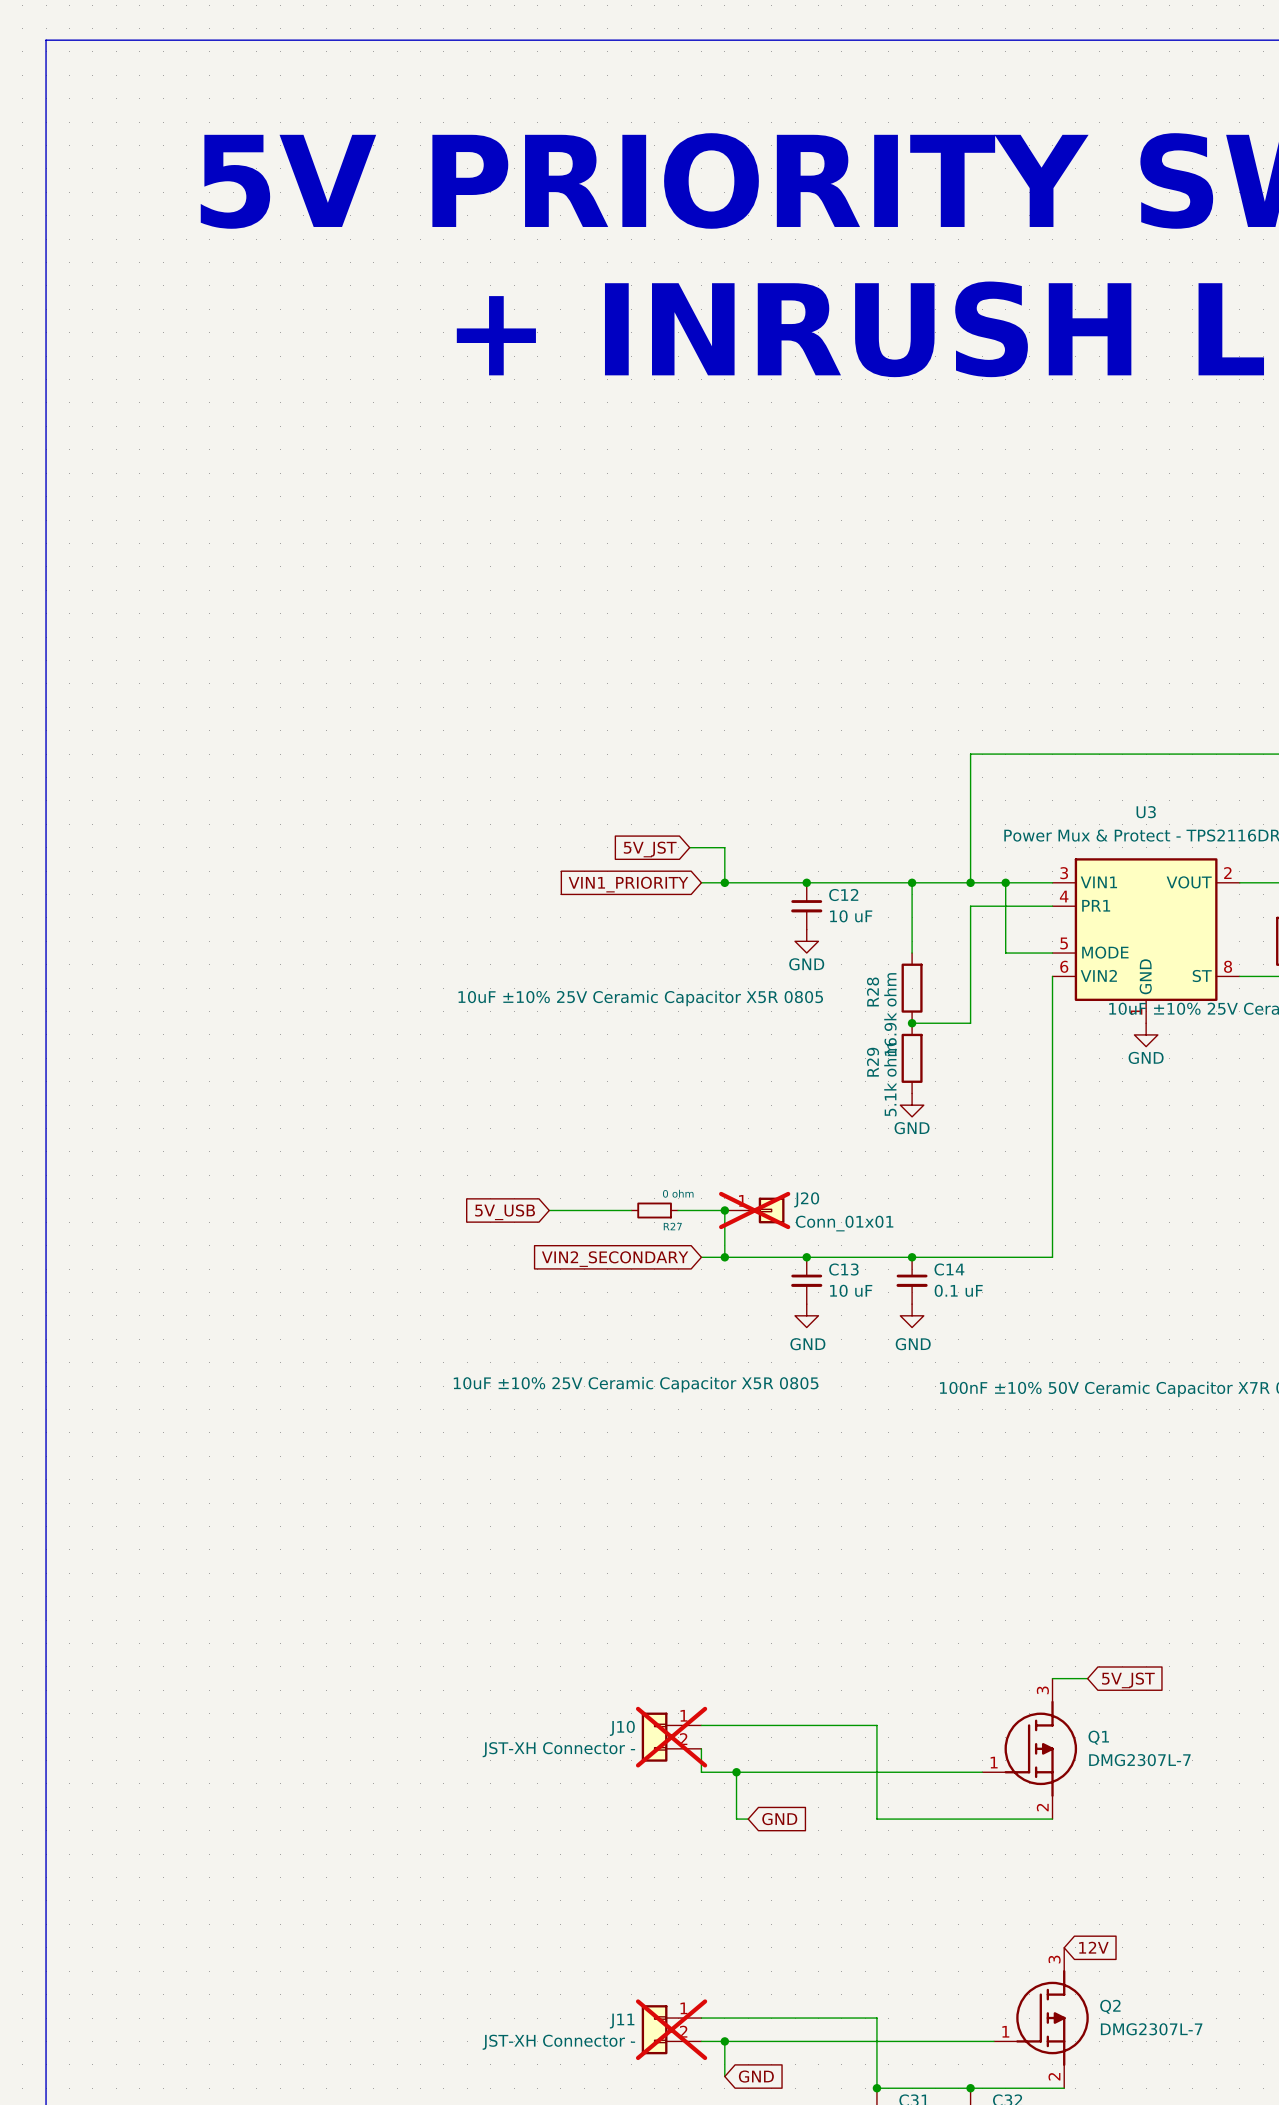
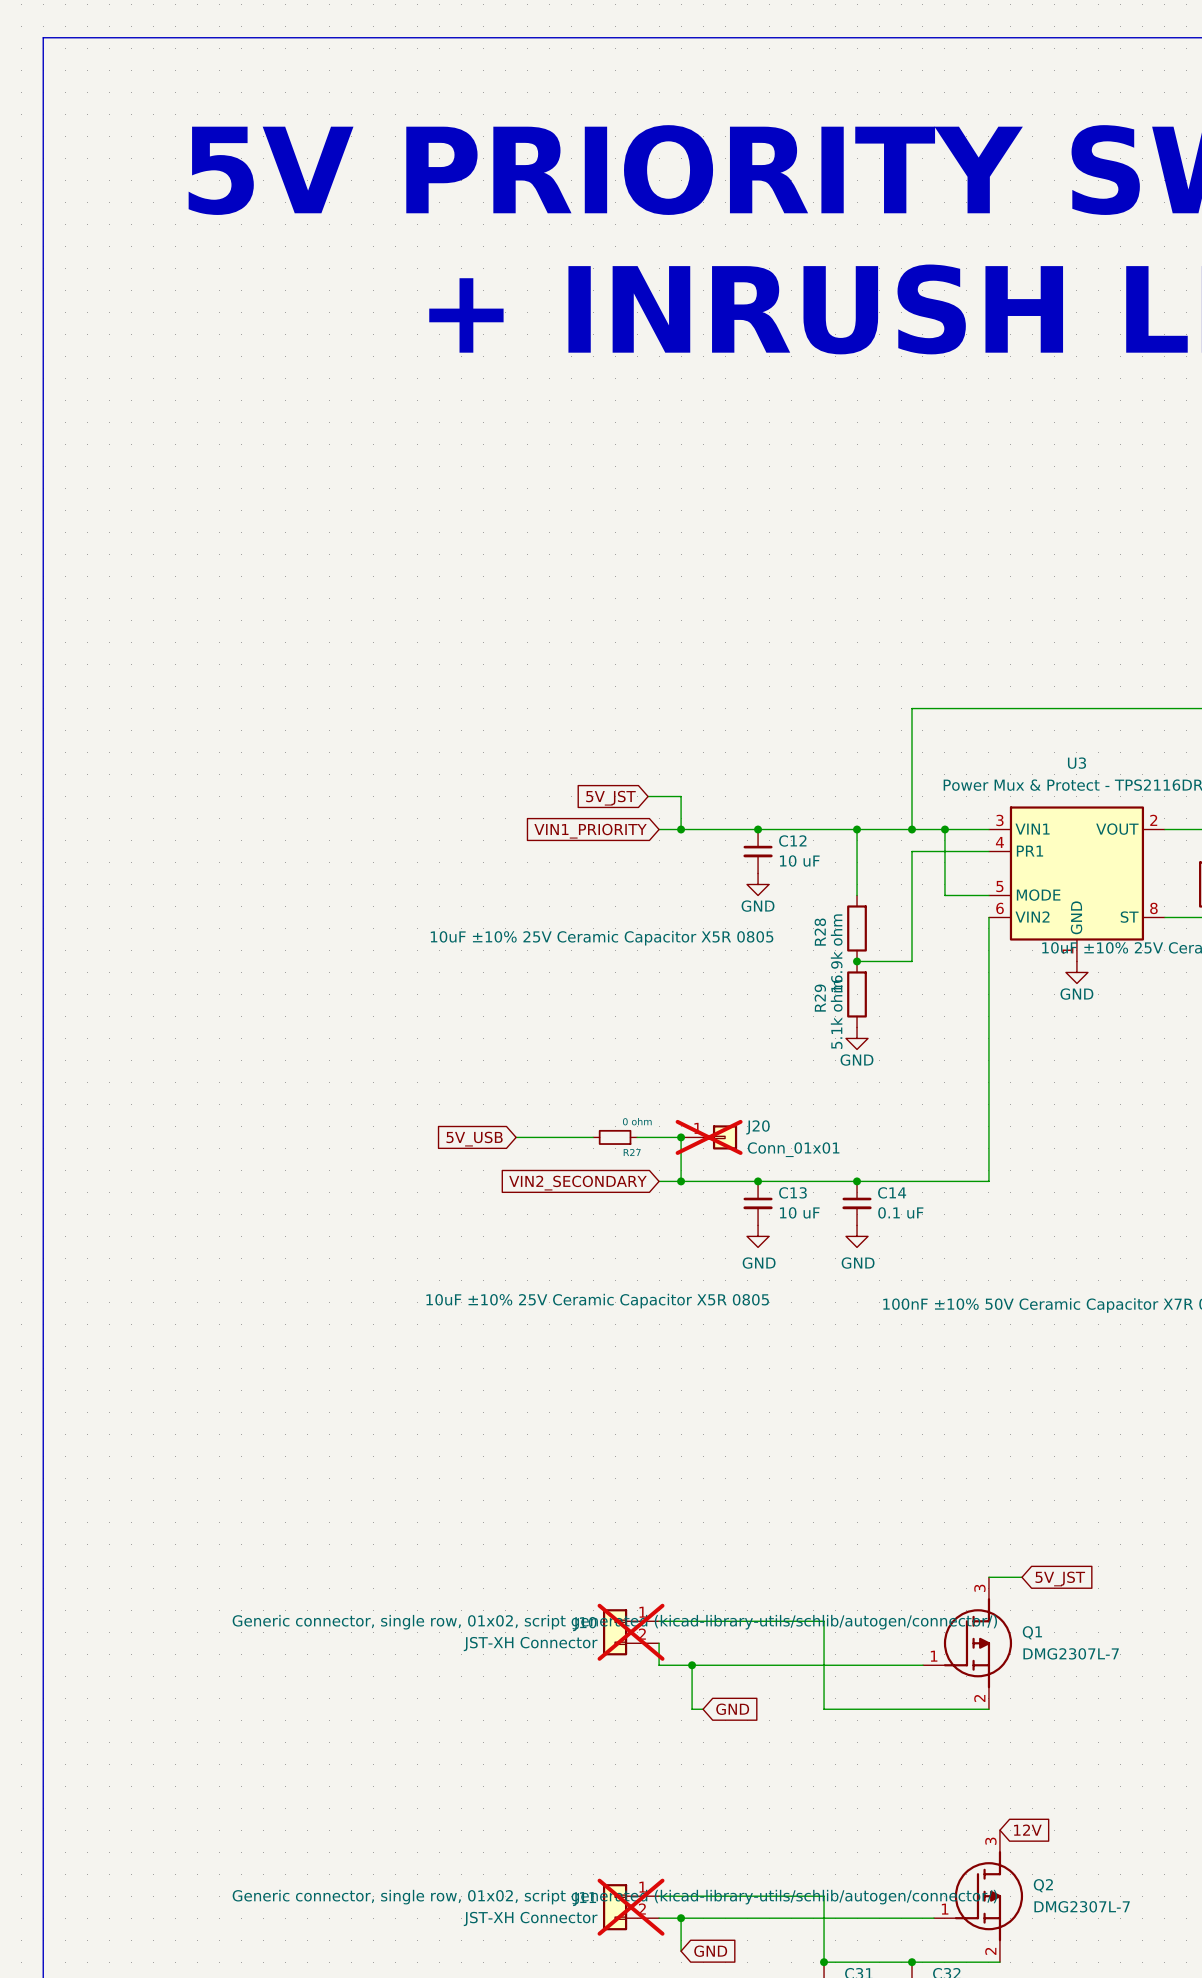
J10 text: none -> Generic connector, single row, 01x02, script generated (kicad-library-utils/schlib/autogen/connector/) (614, 1622)
J10 value: JST-XH Connector - (558, 1749) -> JST-XH Connector (530, 1644)
J11 text: none -> Generic connector, single row, 01x02, script generated (kicad-library-utils/schlib/autogen/connector/) (614, 1897)
J11 value: JST-XH Connector - (558, 2042) -> JST-XH Connector (530, 1918)

